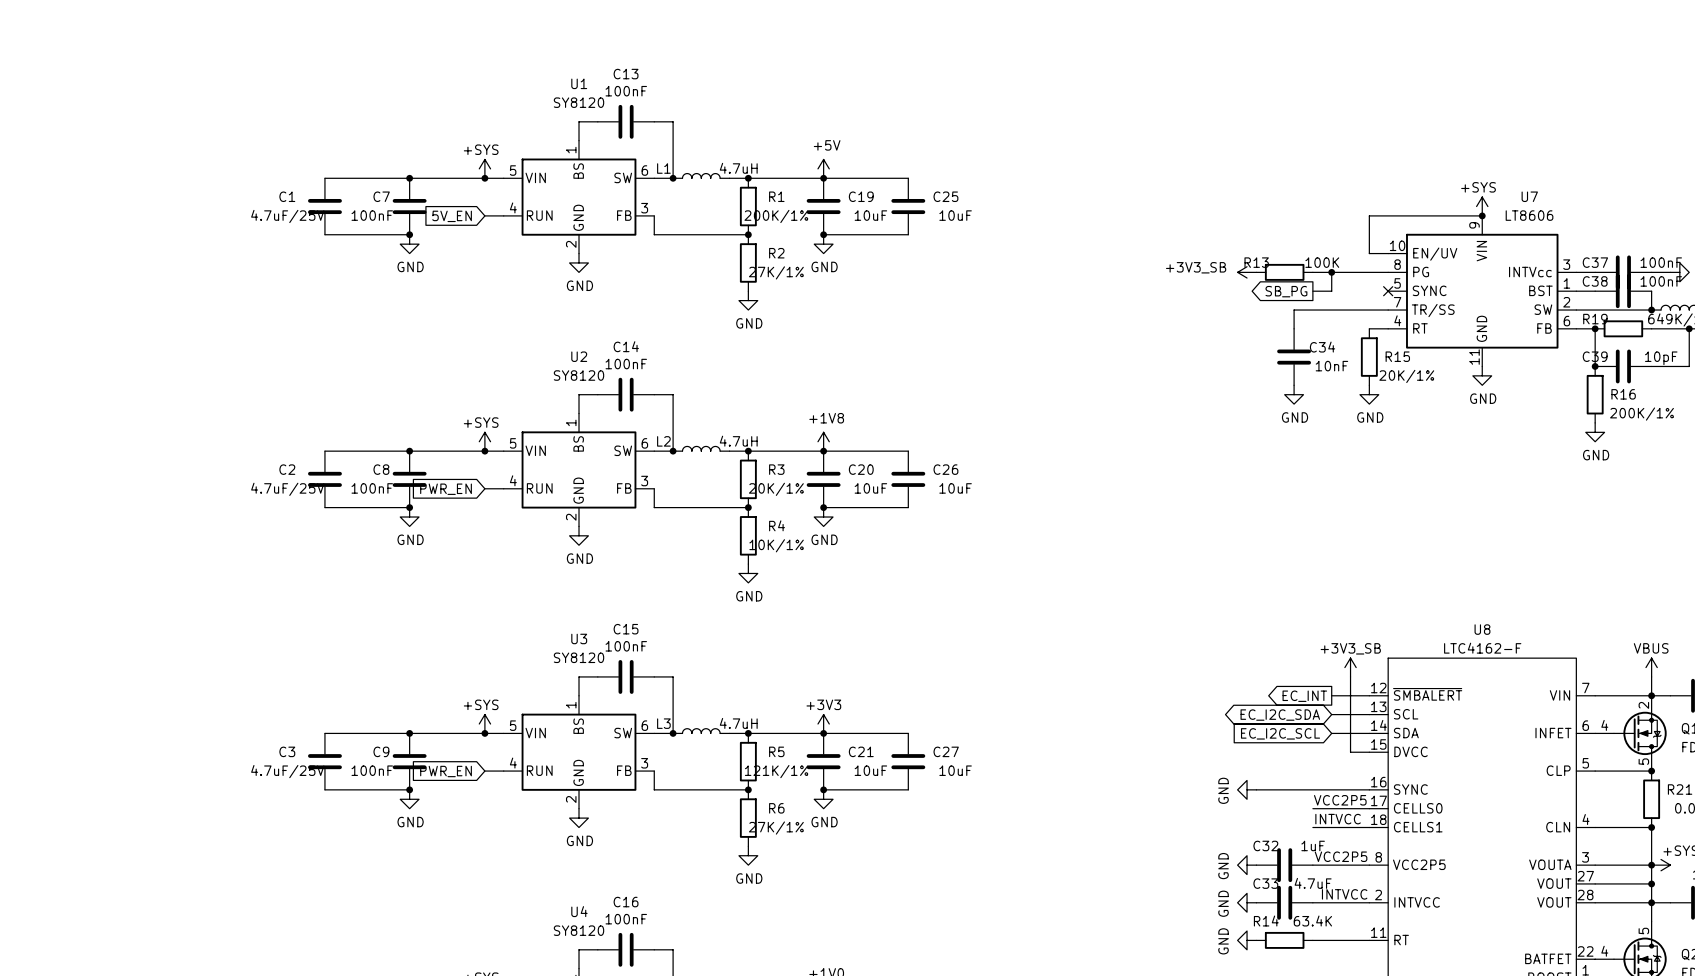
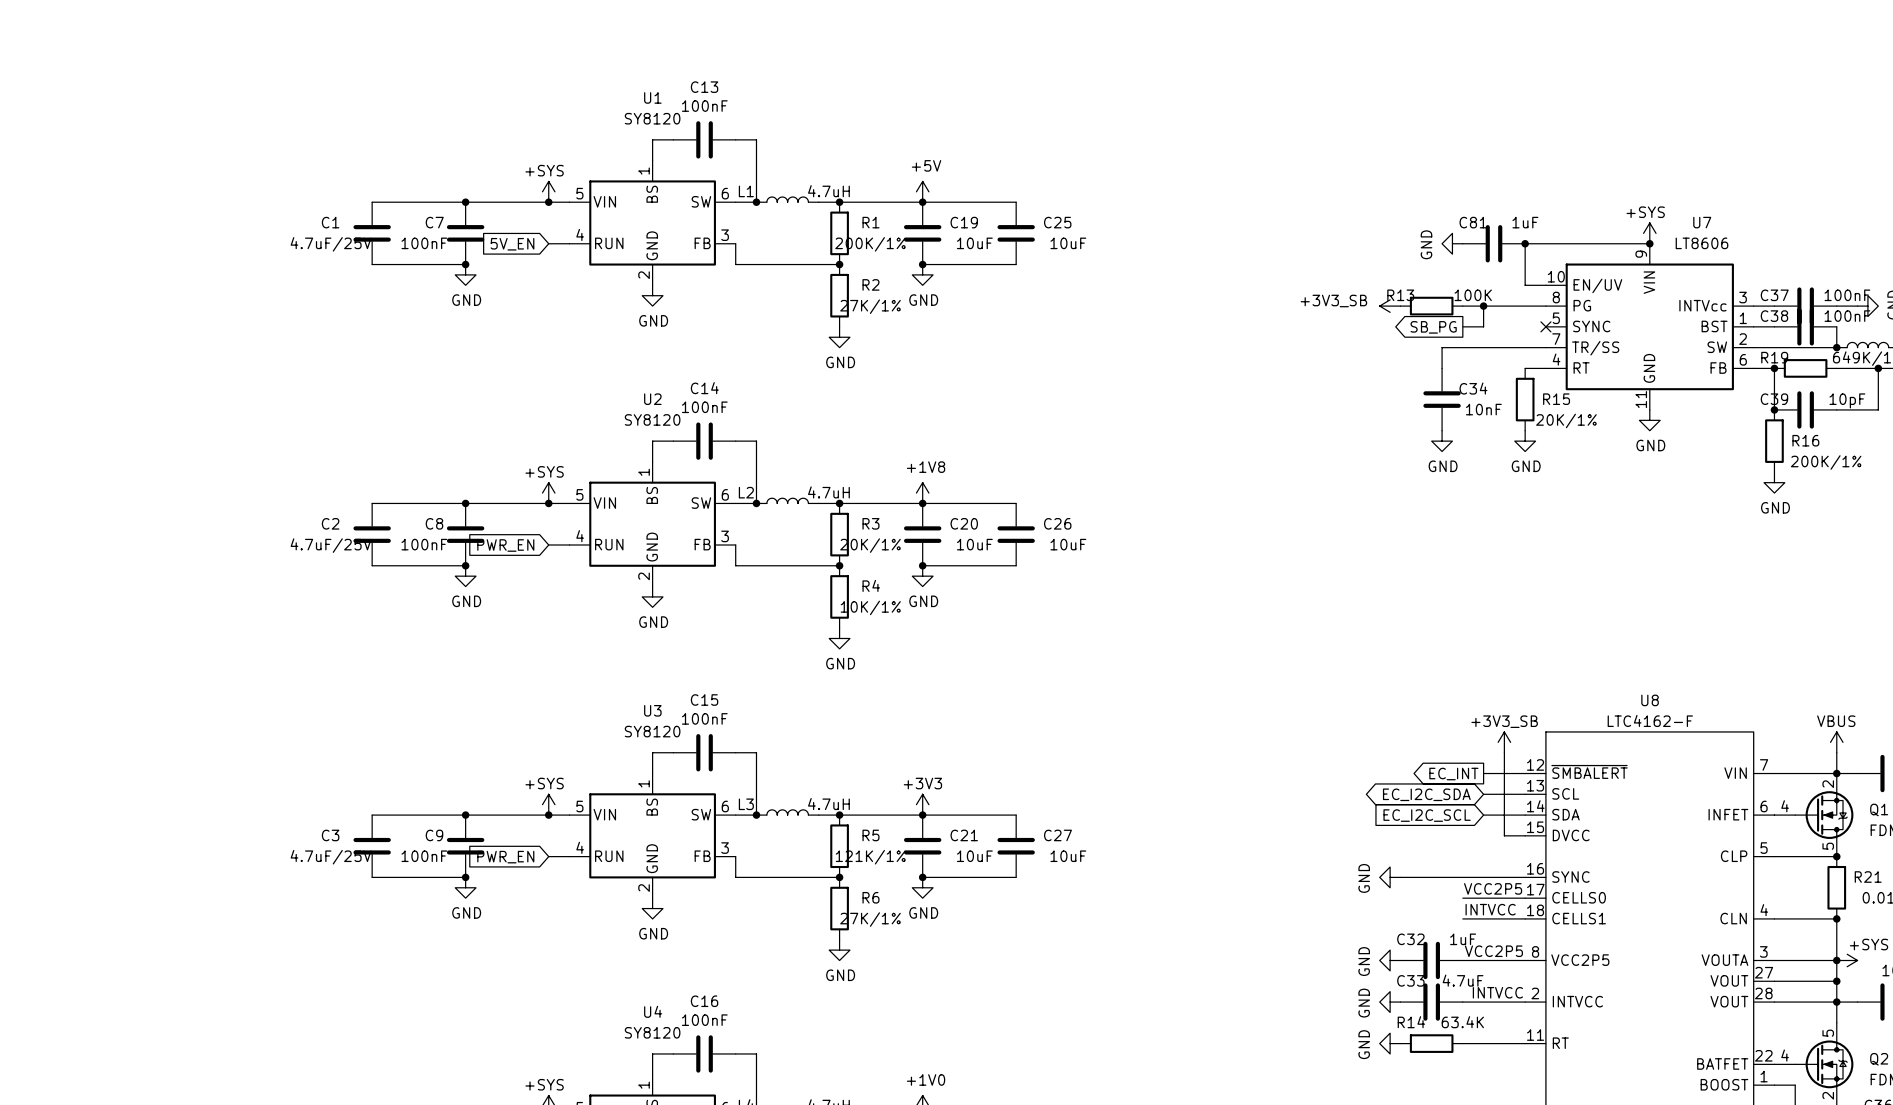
power symbol: none -> GND (1452, 243)
C81: none -> 1uF (1493, 243)
junction: none -> (1525, 243)

